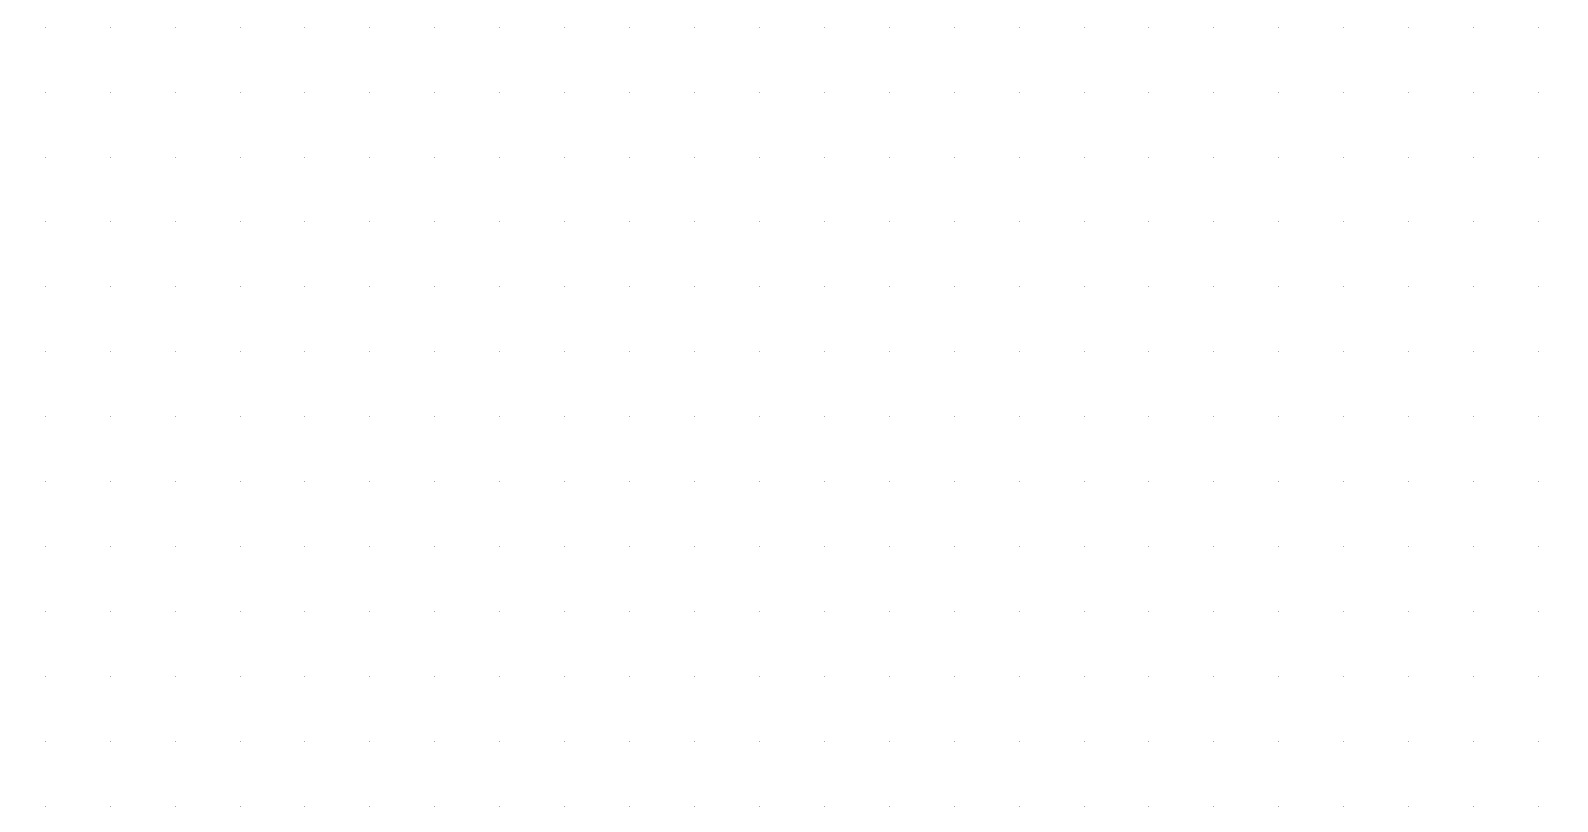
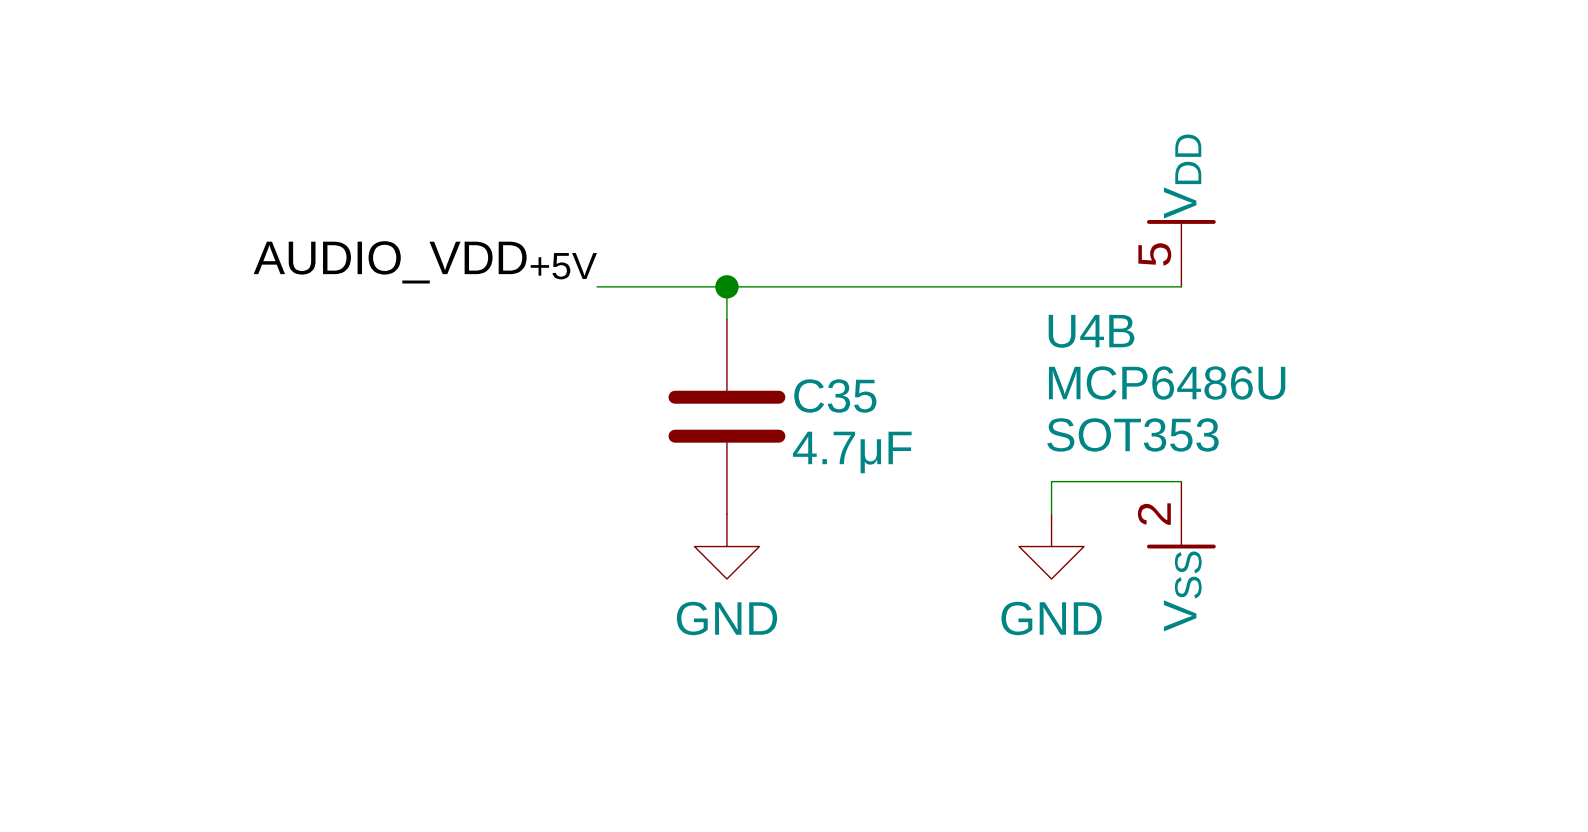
label: none -> AUDIO_VDD+5V (425, 262)
wire: none -> (597, 286) (1181, 286)
wire: none -> (726, 286) (726, 319)
junction: none -> (726, 286)
U4B: none -> MCP6486U (1181, 384)
C35: none -> 4.7μF (726, 416)
wire: none -> (1181, 481) (1051, 481) (1051, 514)
power symbol: none -> GND (726, 546)
power symbol: none -> GND (1051, 546)

